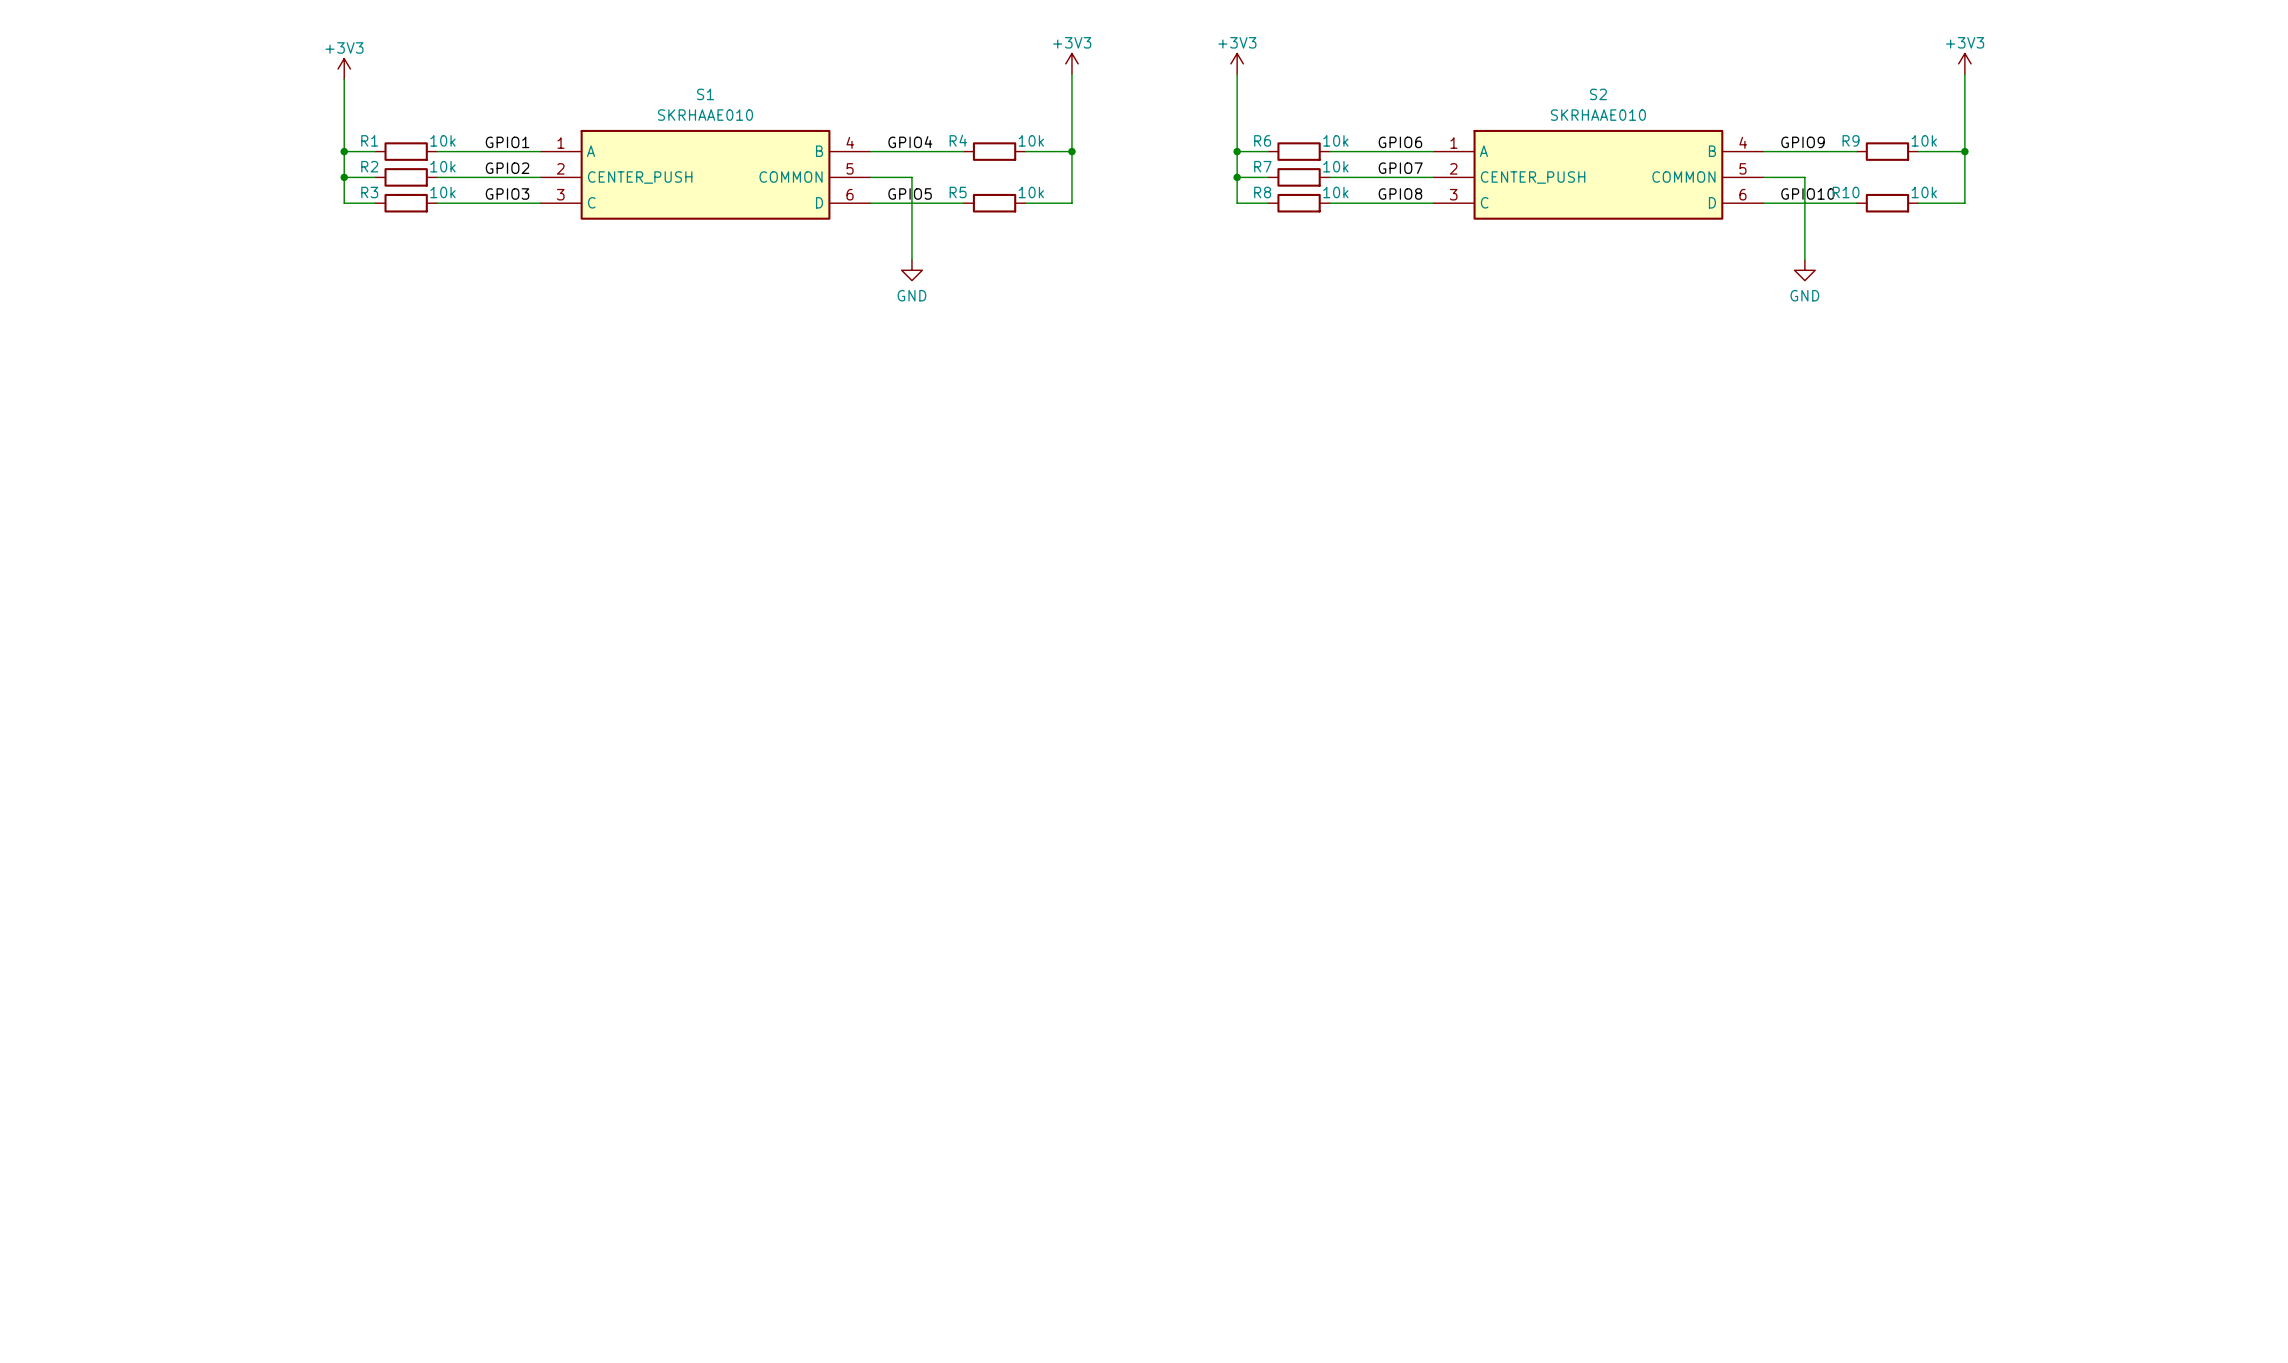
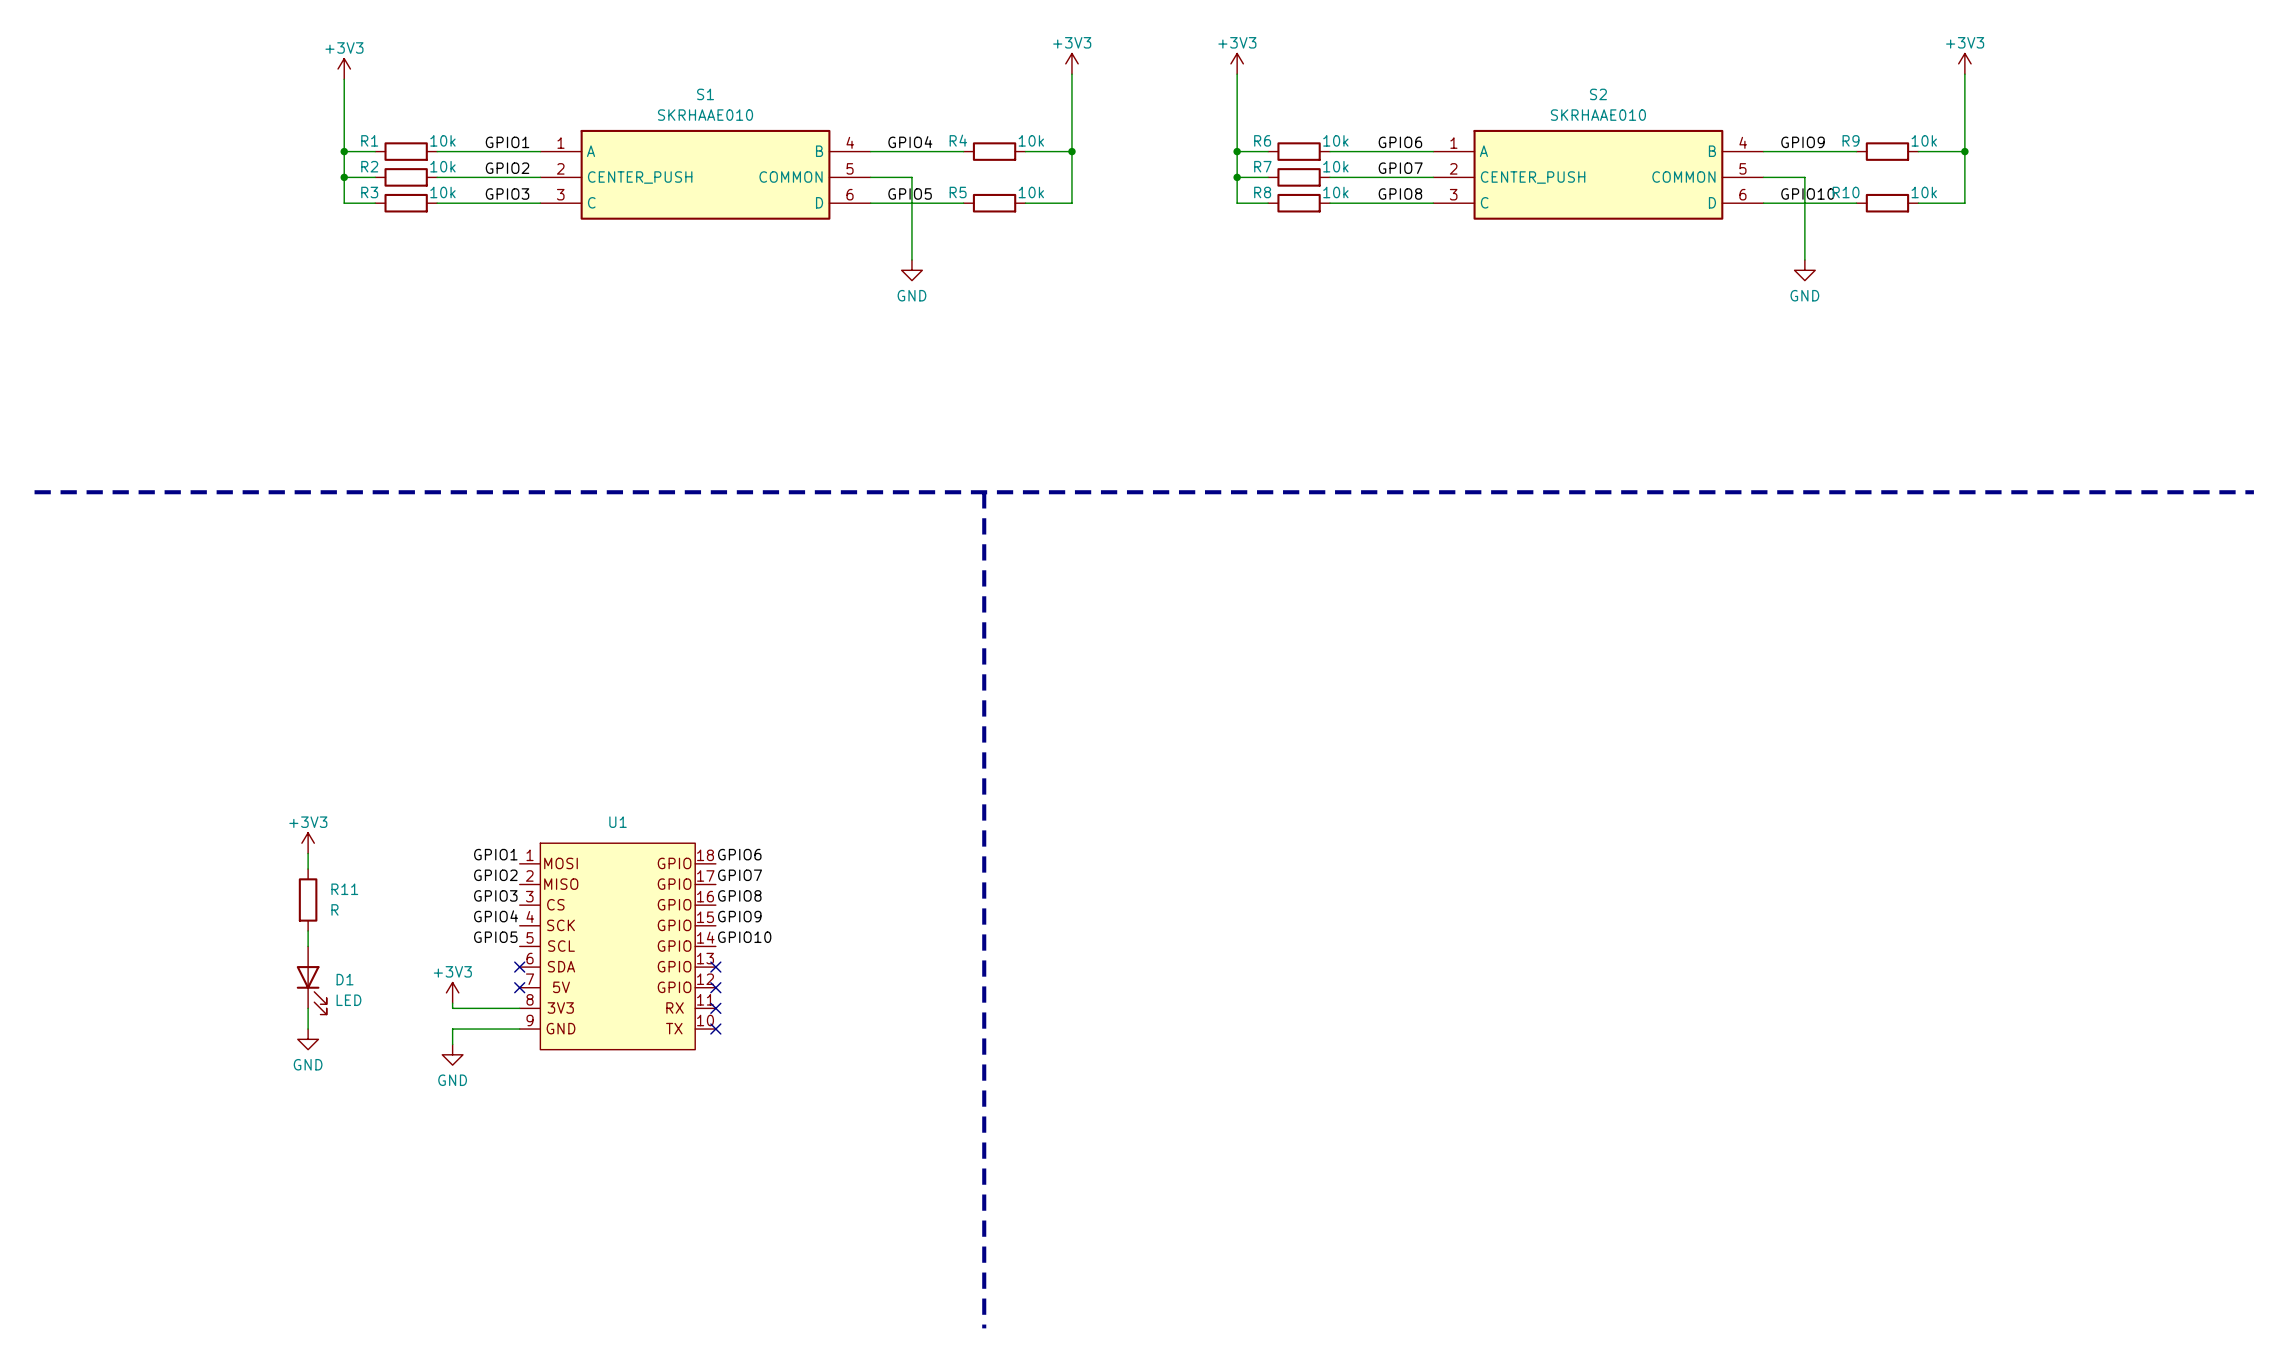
line: none -> (34, 492) (2253, 492)
line: none -> (984, 492) (984, 1328)
power symbol: none -> +3V3 (308, 843)
wire: none -> (308, 853) (308, 869)
label: none -> GPIO1 (495, 854)
label: none -> GPIO6 (739, 854)
label: none -> GPIO2 (495, 875)
label: none -> GPIO7 (740, 875)
label: none -> GPIO3 (495, 895)
label: none -> GPIO8 (739, 895)
R11: none -> R (308, 899)
label: none -> GPIO4 (496, 916)
label: none -> GPIO9 (739, 916)
wire: none -> (308, 930) (308, 946)
label: none -> GPIO5 (495, 937)
label: none -> GPIO10 (744, 937)
U1: none -> (617, 946)
no-connect mark: none -> (519, 967)
no-connect mark: none -> (715, 967)
D1: none -> LED (311, 980)
no-connect mark: none -> (519, 987)
no-connect mark: none -> (715, 987)
power symbol: none -> +3V3 (452, 992)
wire: none -> (452, 1003) (452, 1008) (519, 1008)
wire: none -> (308, 1008) (308, 1029)
no-connect mark: none -> (715, 1008)
wire: none -> (519, 1029) (452, 1029) (452, 1044)
no-connect mark: none -> (715, 1029)
power symbol: none -> GND (308, 1039)
power symbol: none -> GND (452, 1054)

